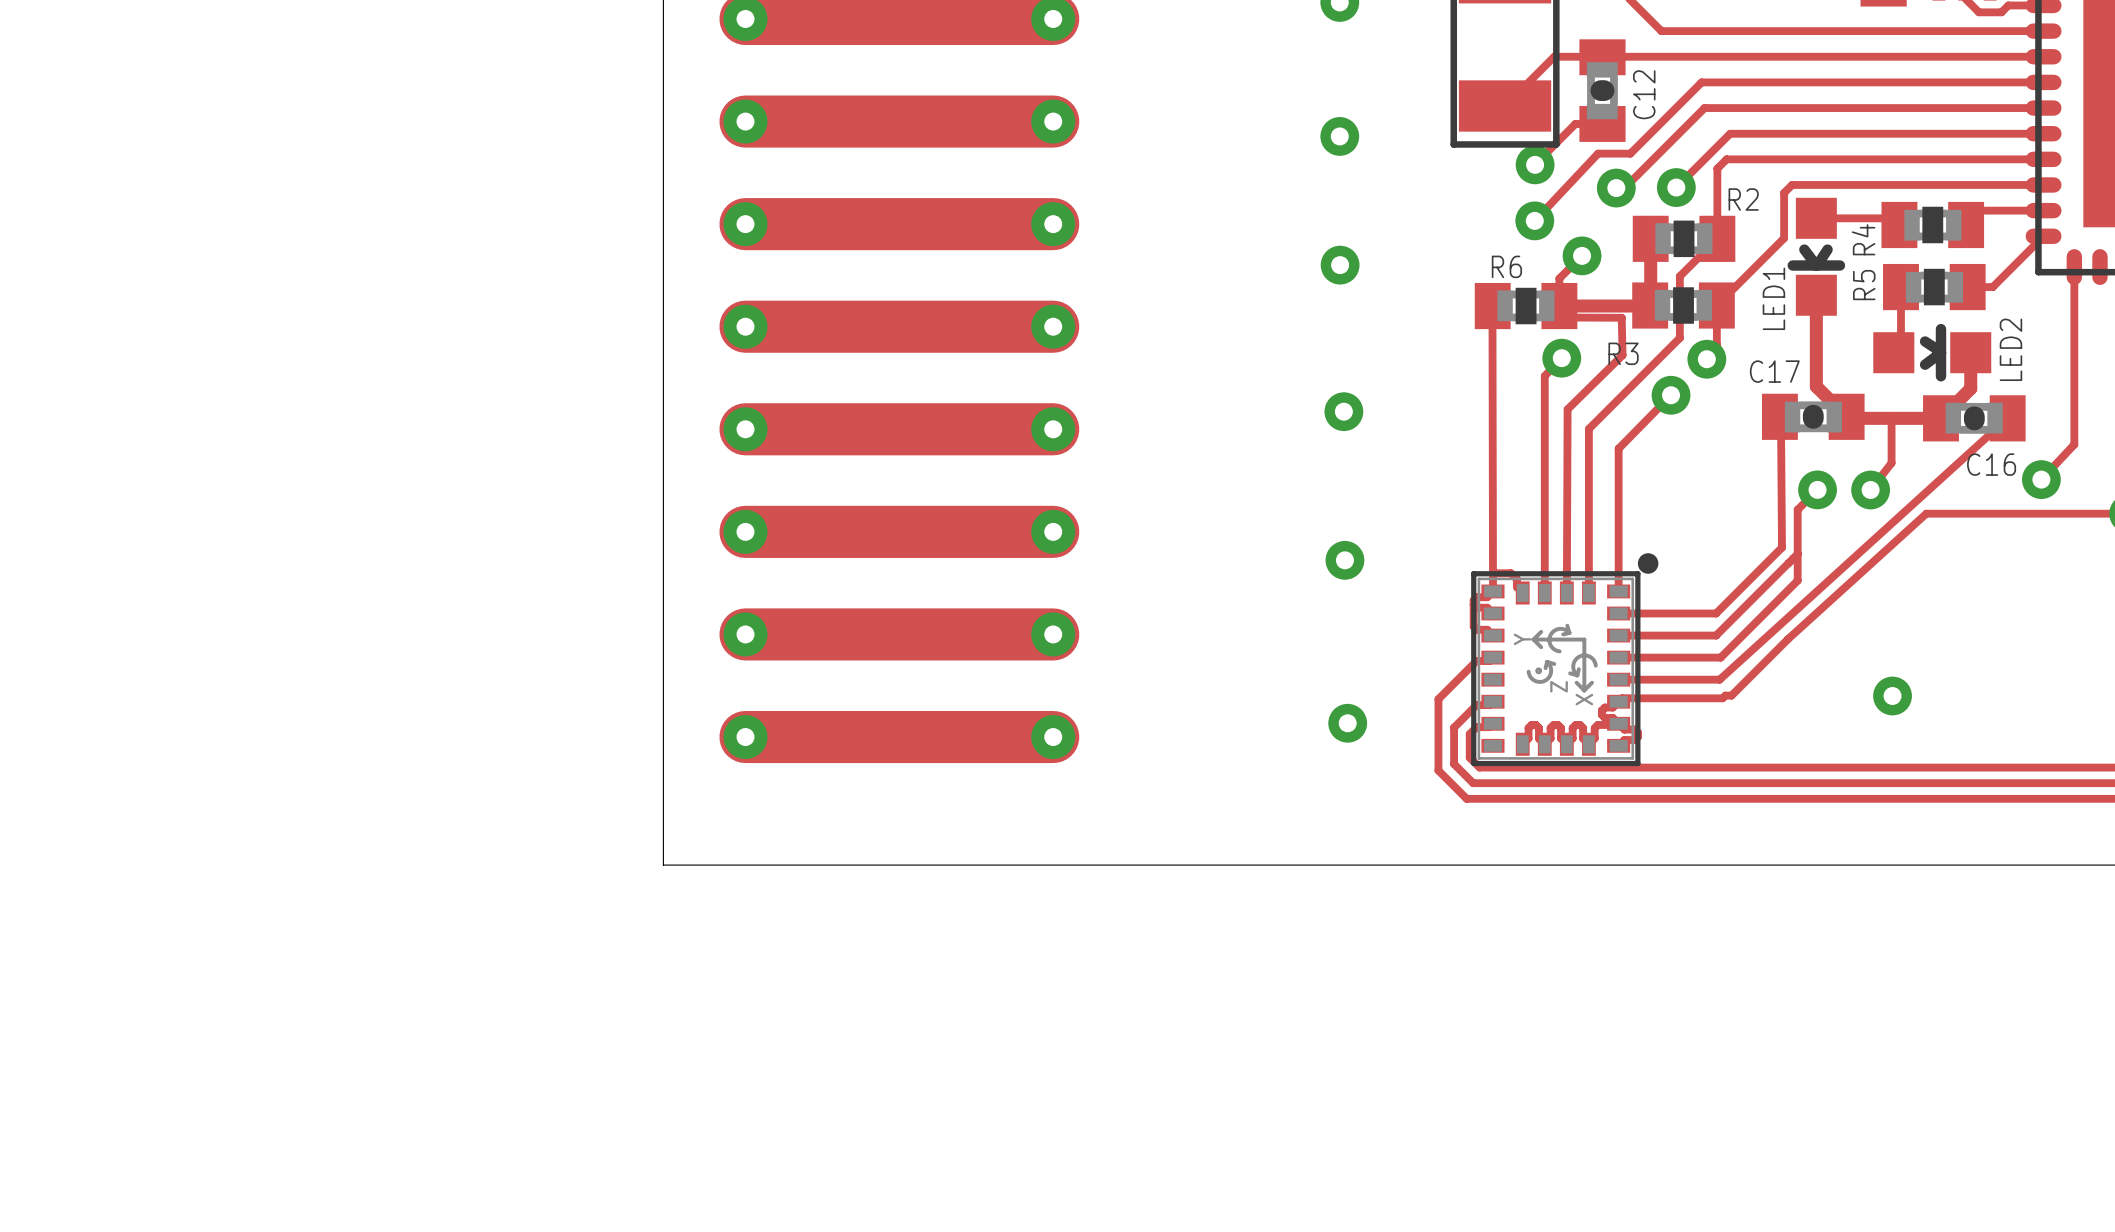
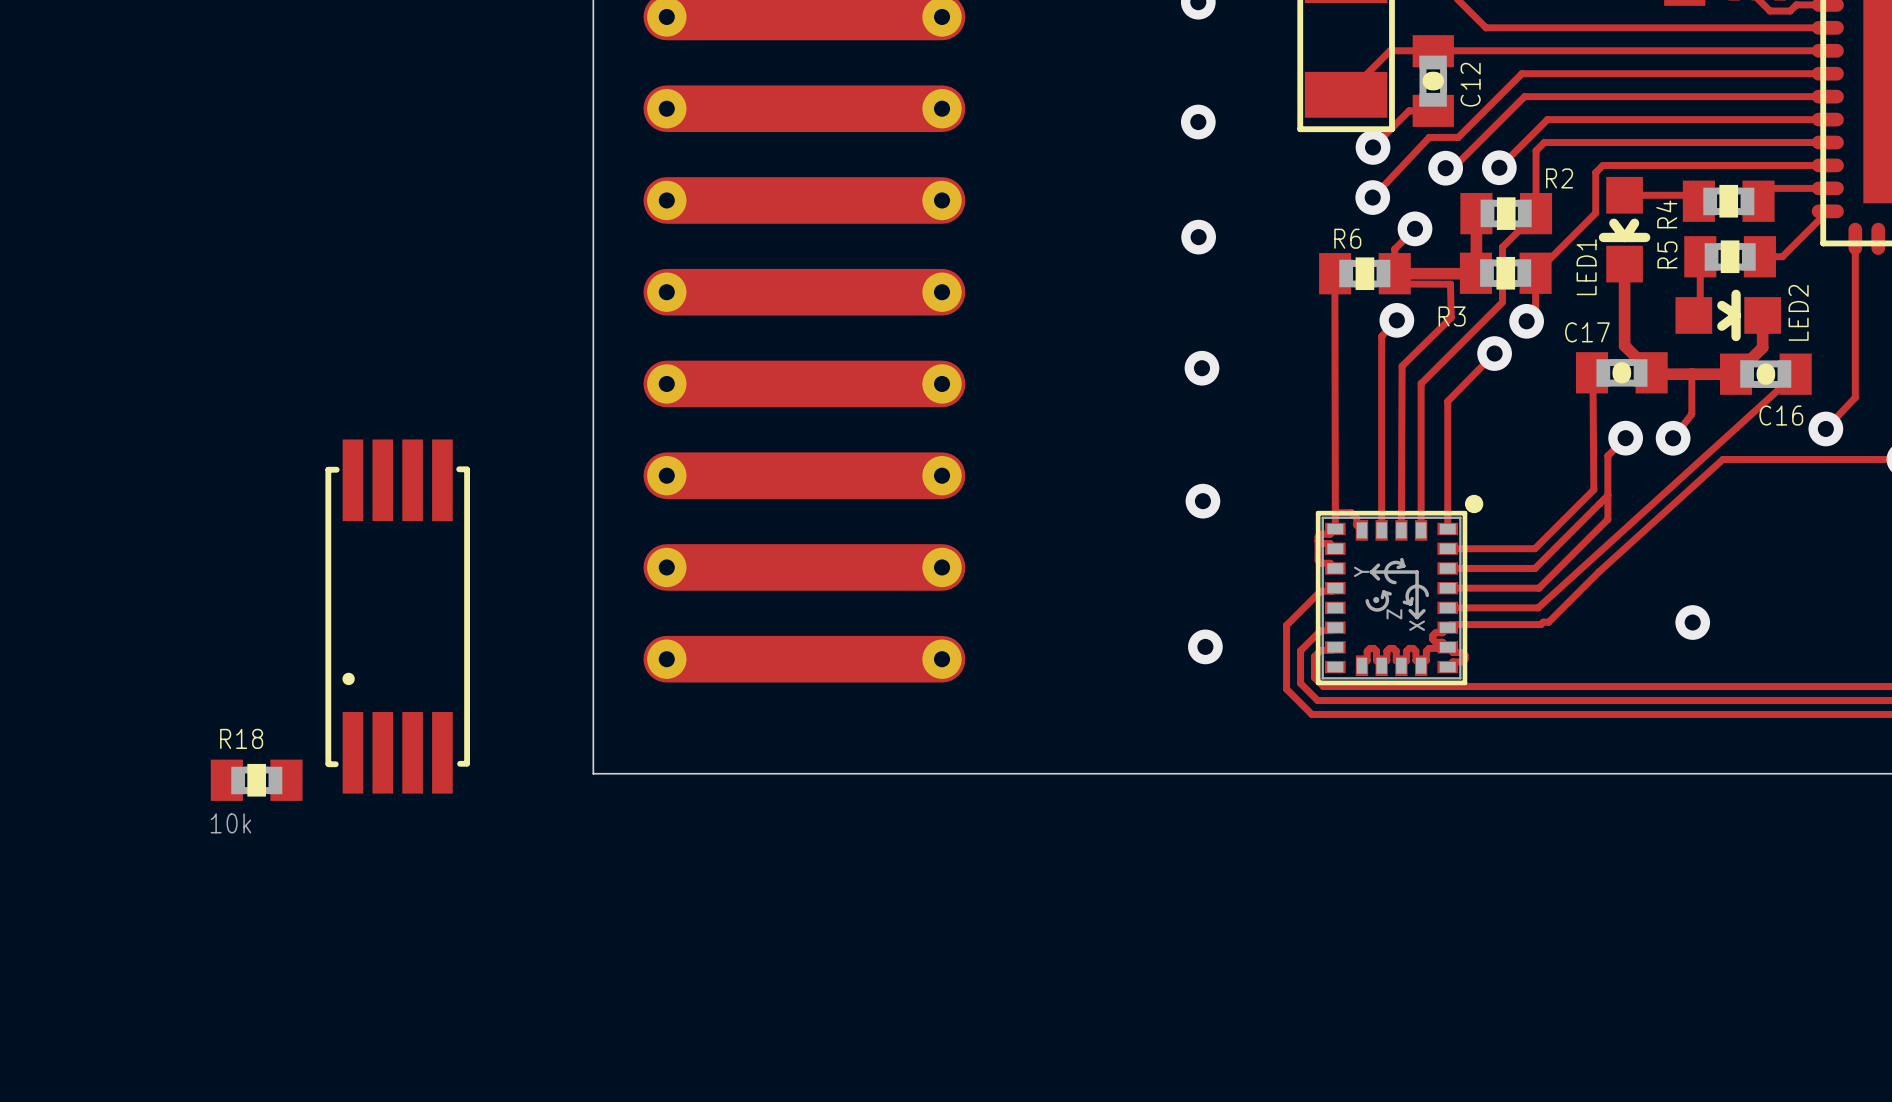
part: none -> (397, 616)
R18: none -> 10k (256, 780)

